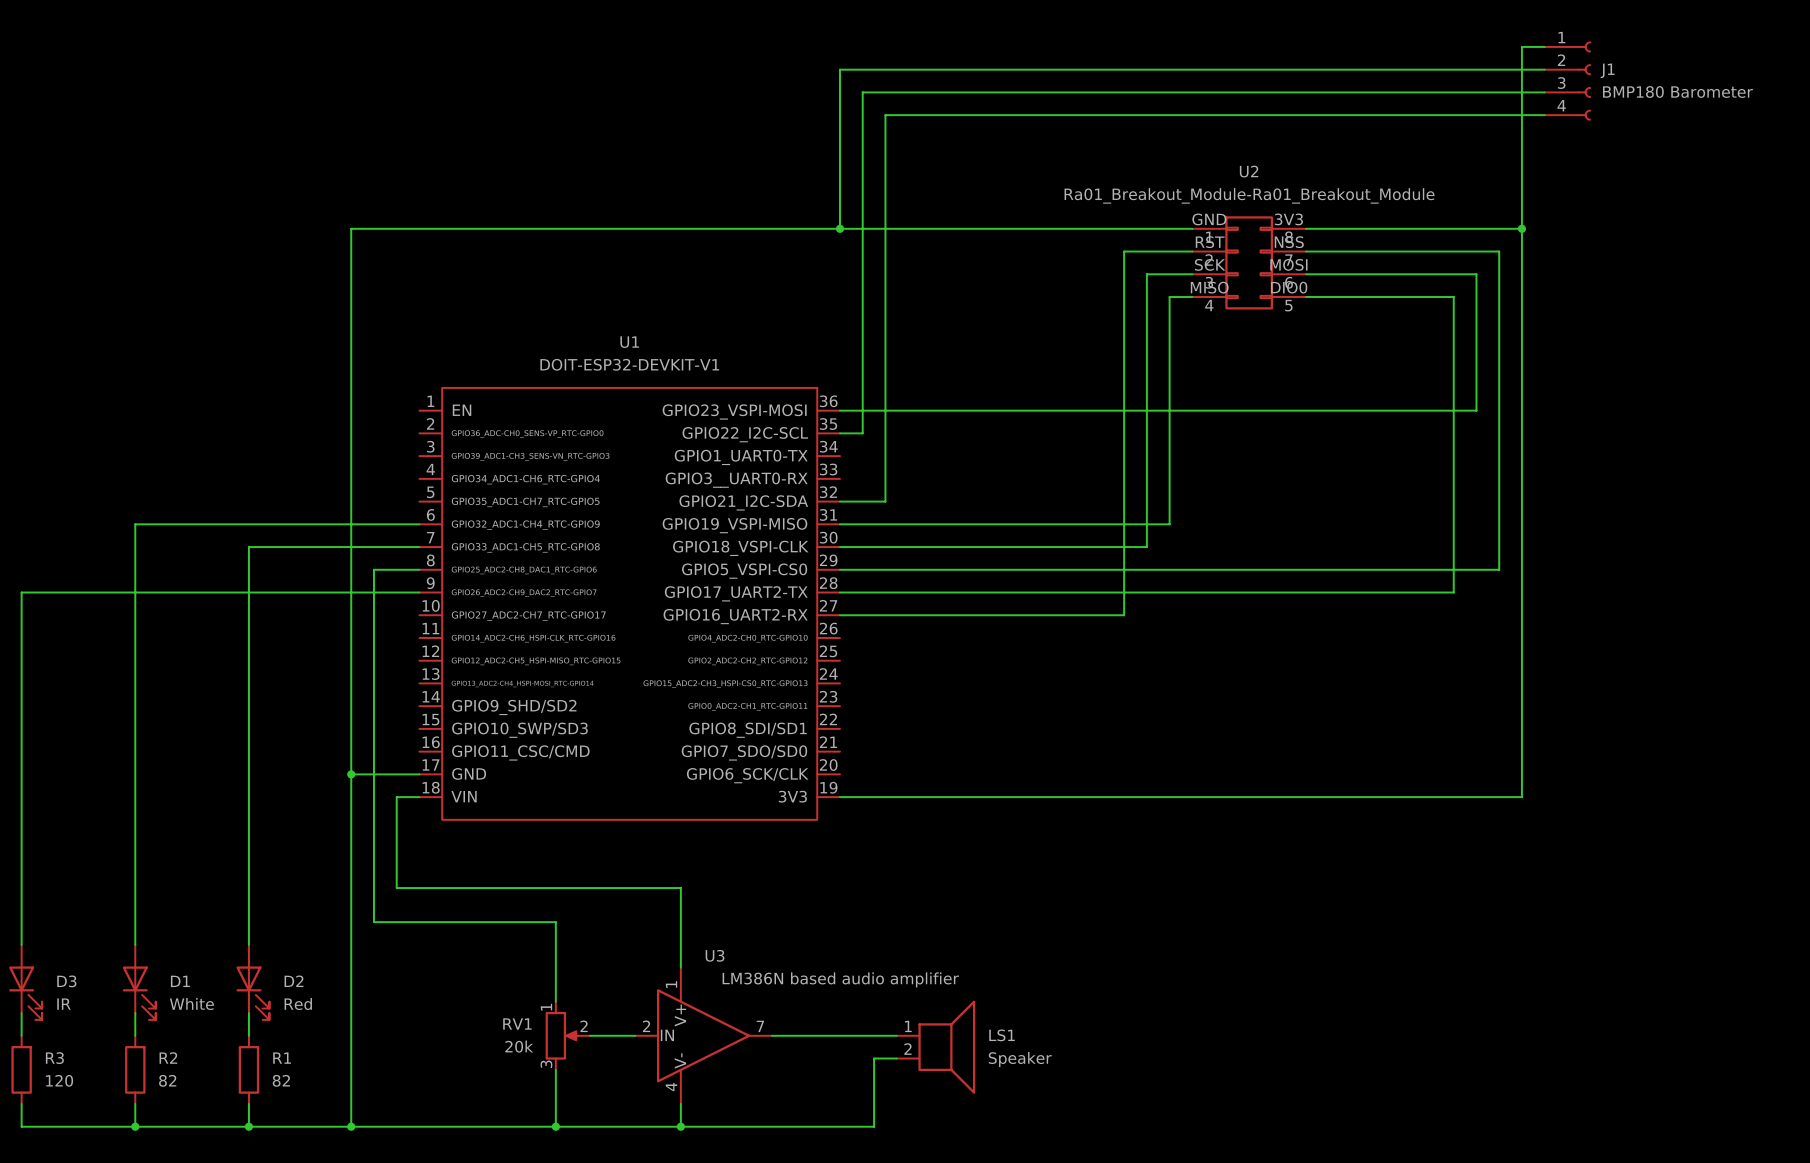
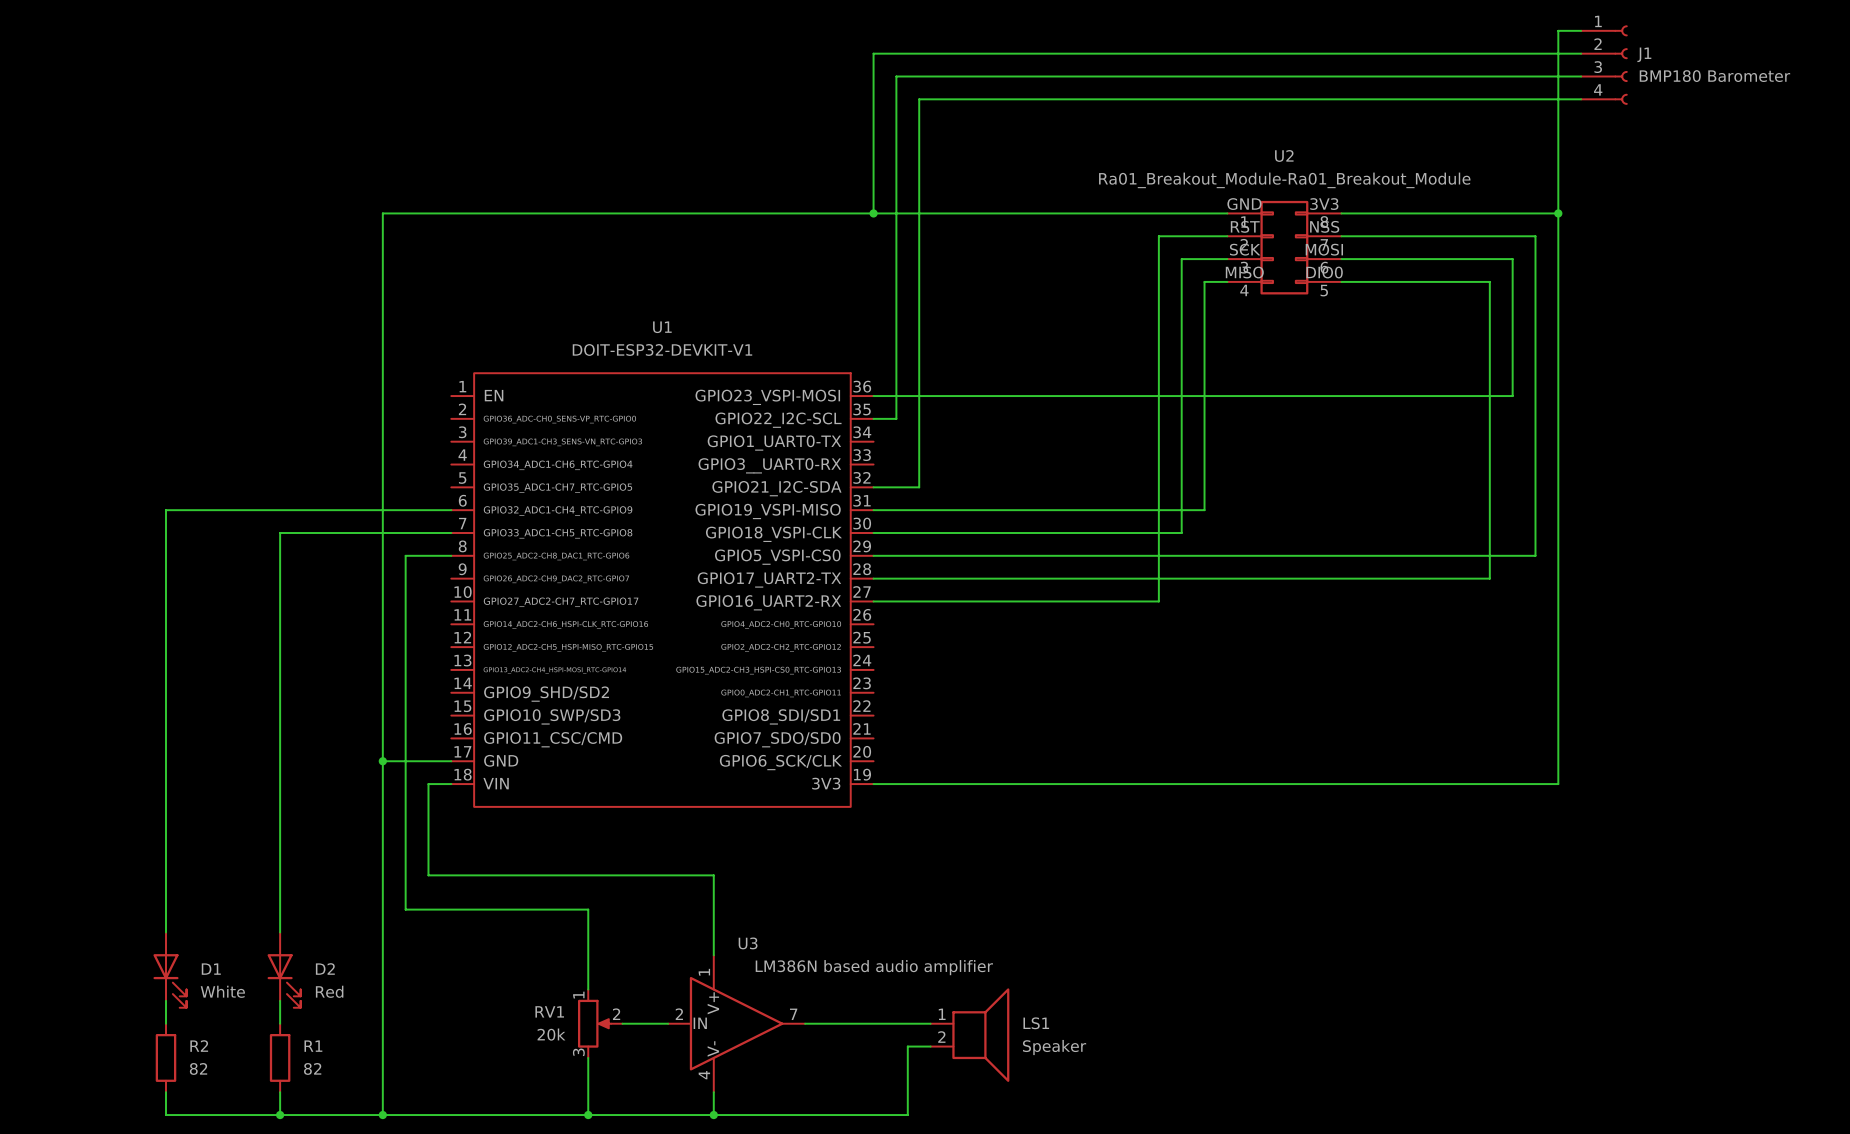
wire: (419, 592) (21, 592) (21, 944) -> none
D3: IR (25, 982) -> none
wire: (21, 1013) (21, 1035) -> none
R3: 120 (21, 1069) -> none
wire: (21, 1103) (21, 1126) (135, 1126) -> none
junction: (135, 1126) -> none

